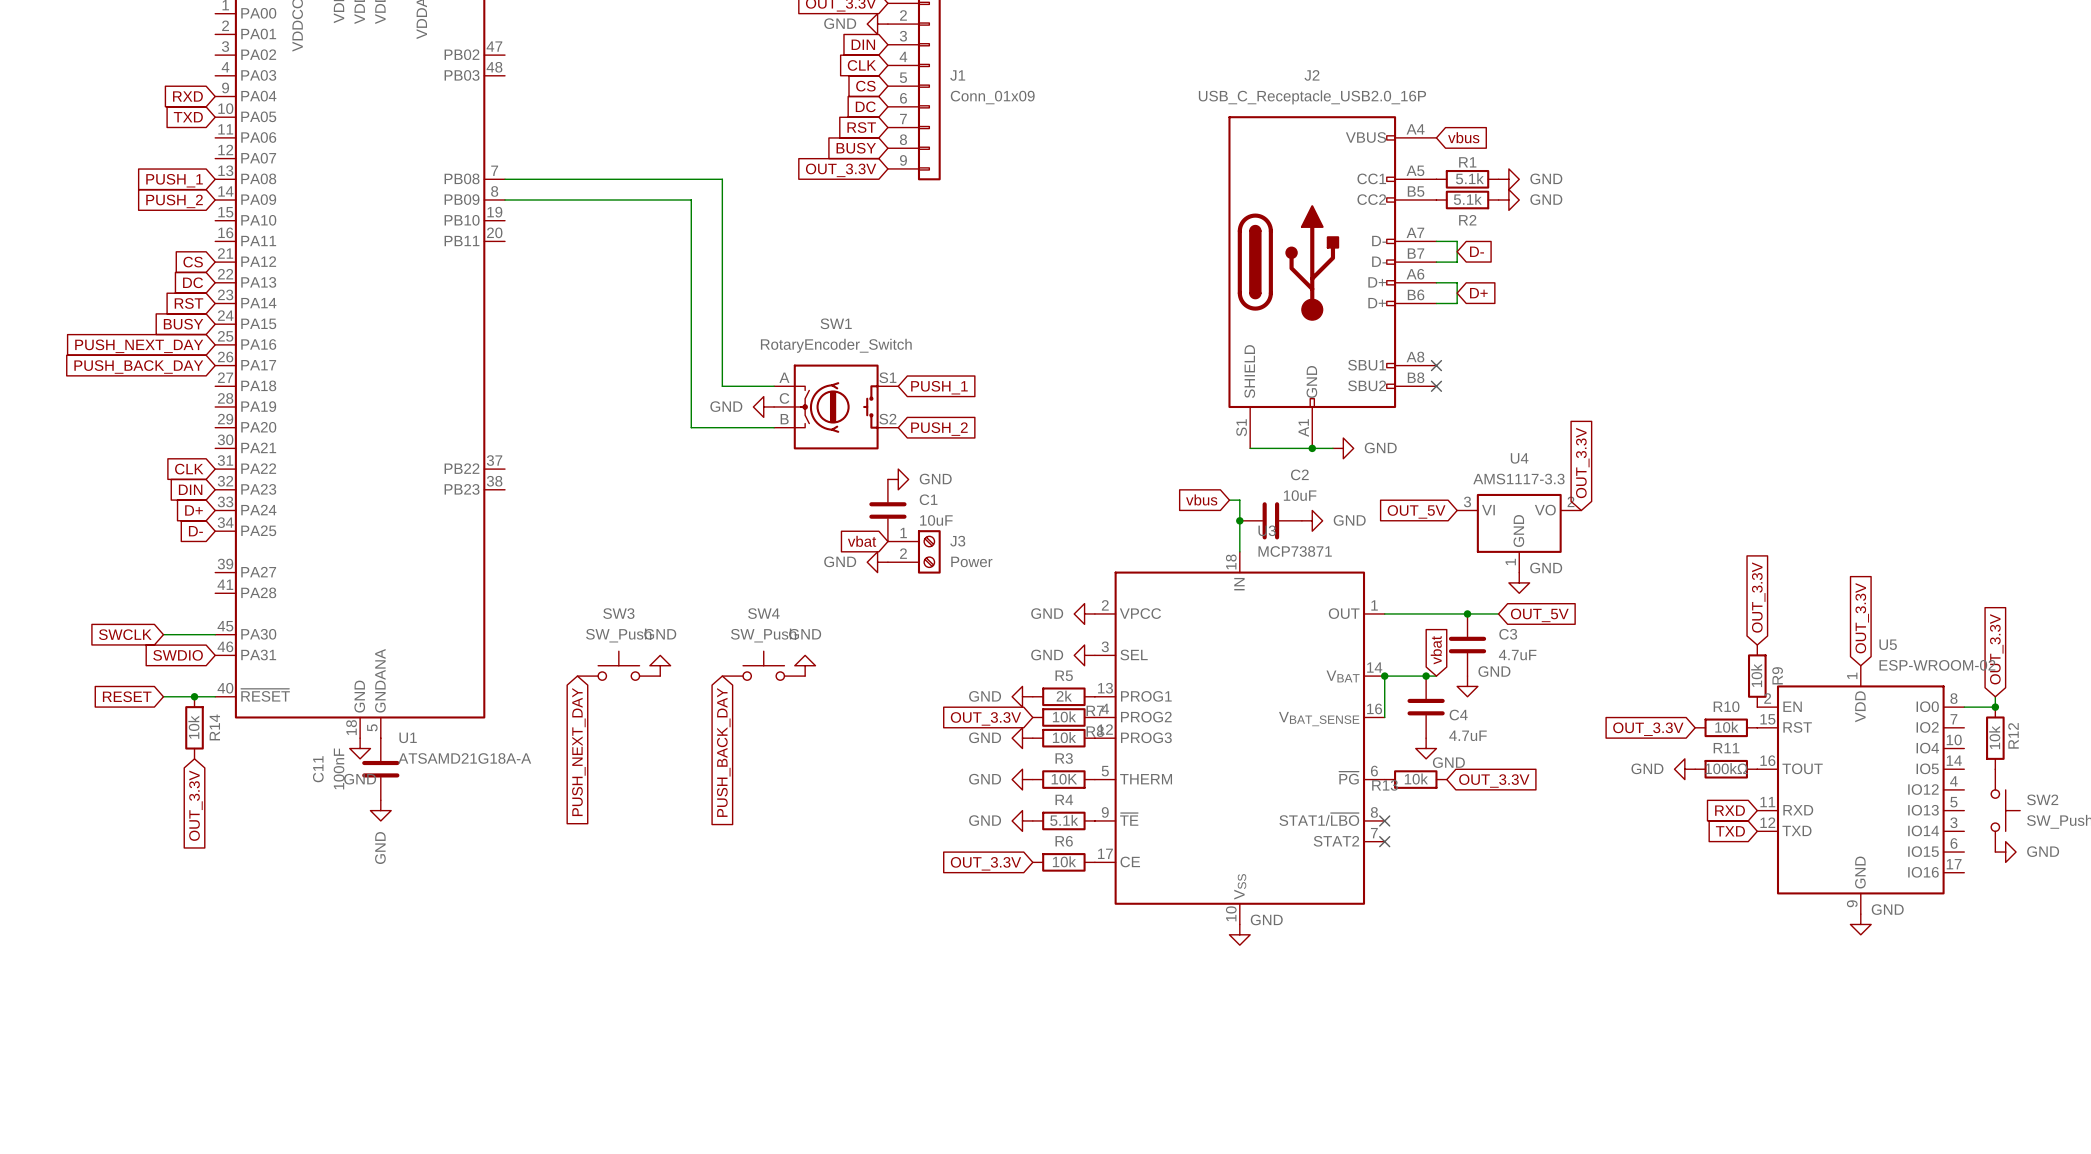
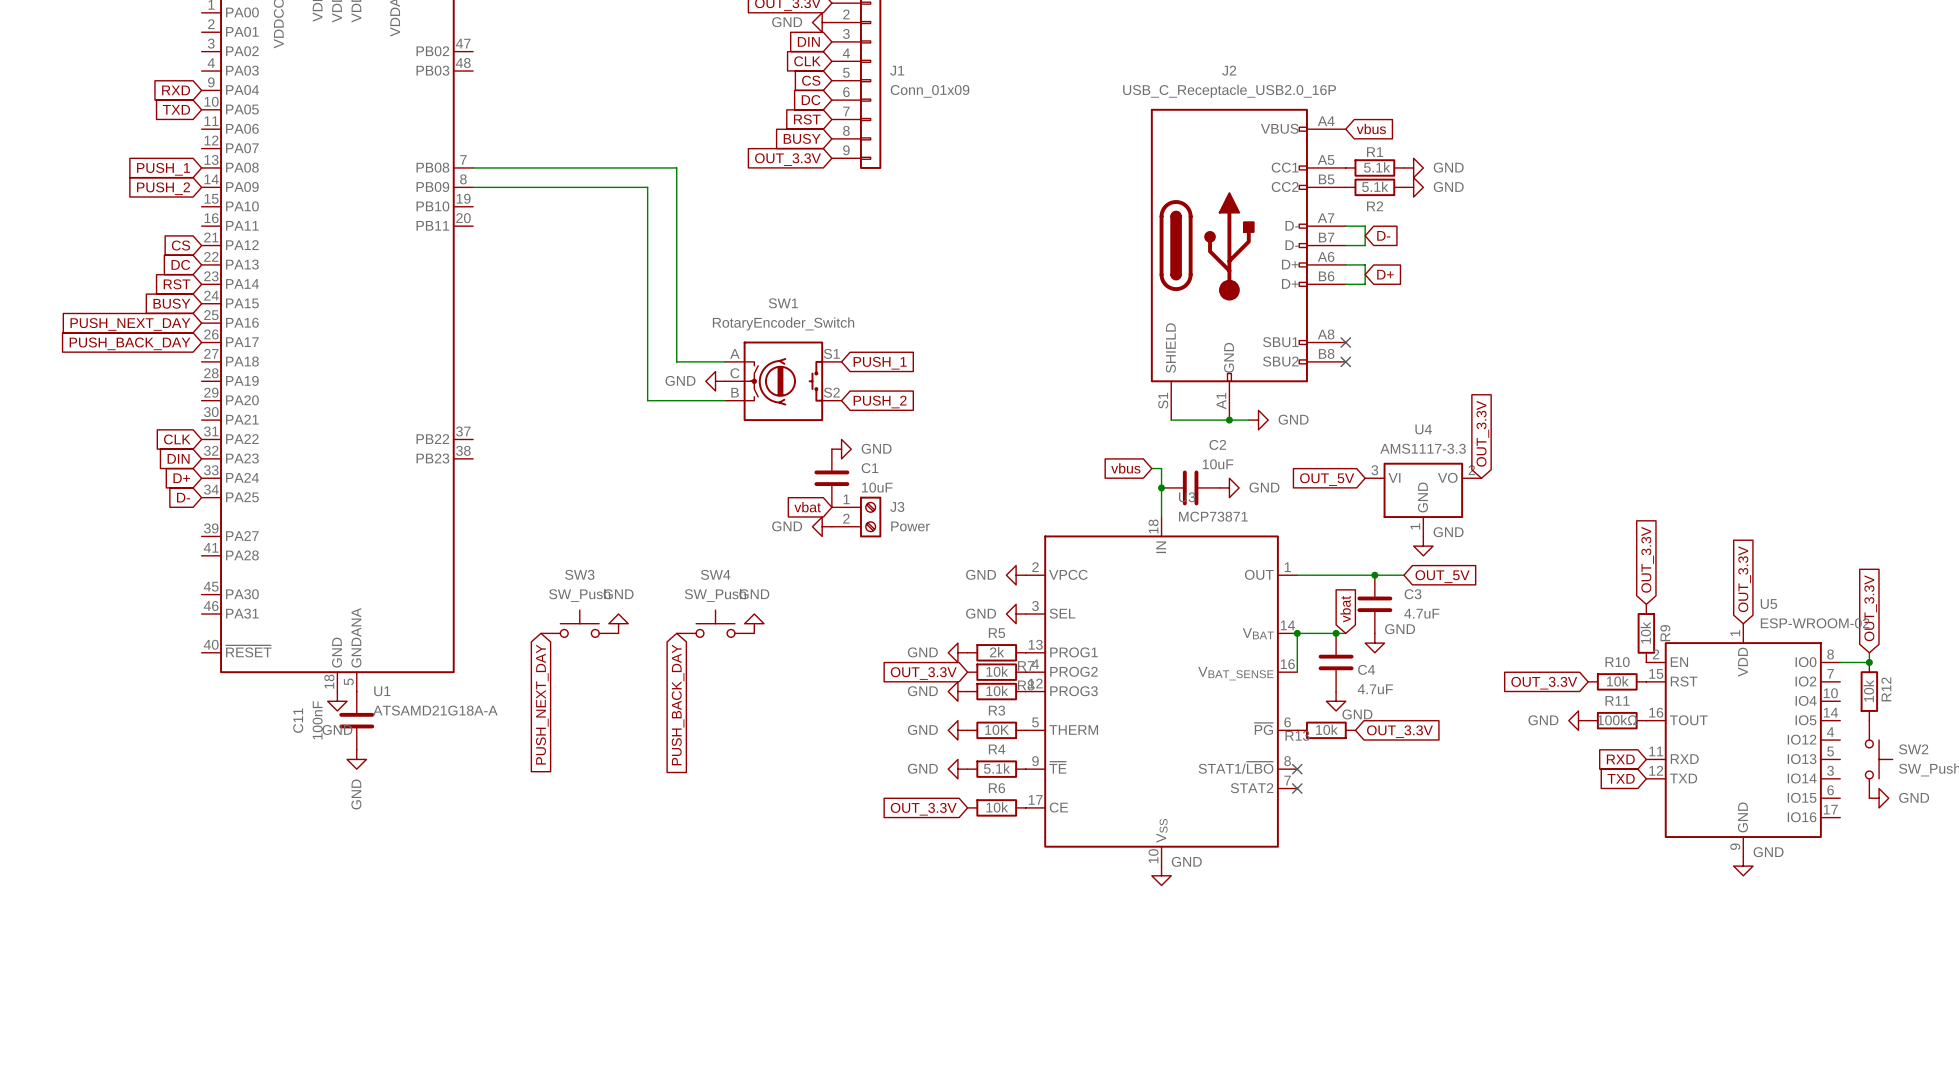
global label: SWCLK (125, 634) -> none
wire: (163, 634) (215, 634) -> none
global label: SWDIO (178, 655) -> none
global label: RESET (127, 696) -> none
wire: (163, 696) (215, 696) -> none
junction: (194, 696) -> none
R14: 10k (194, 727) -> none
global label: OUT_3.3V (195, 805) -> none

